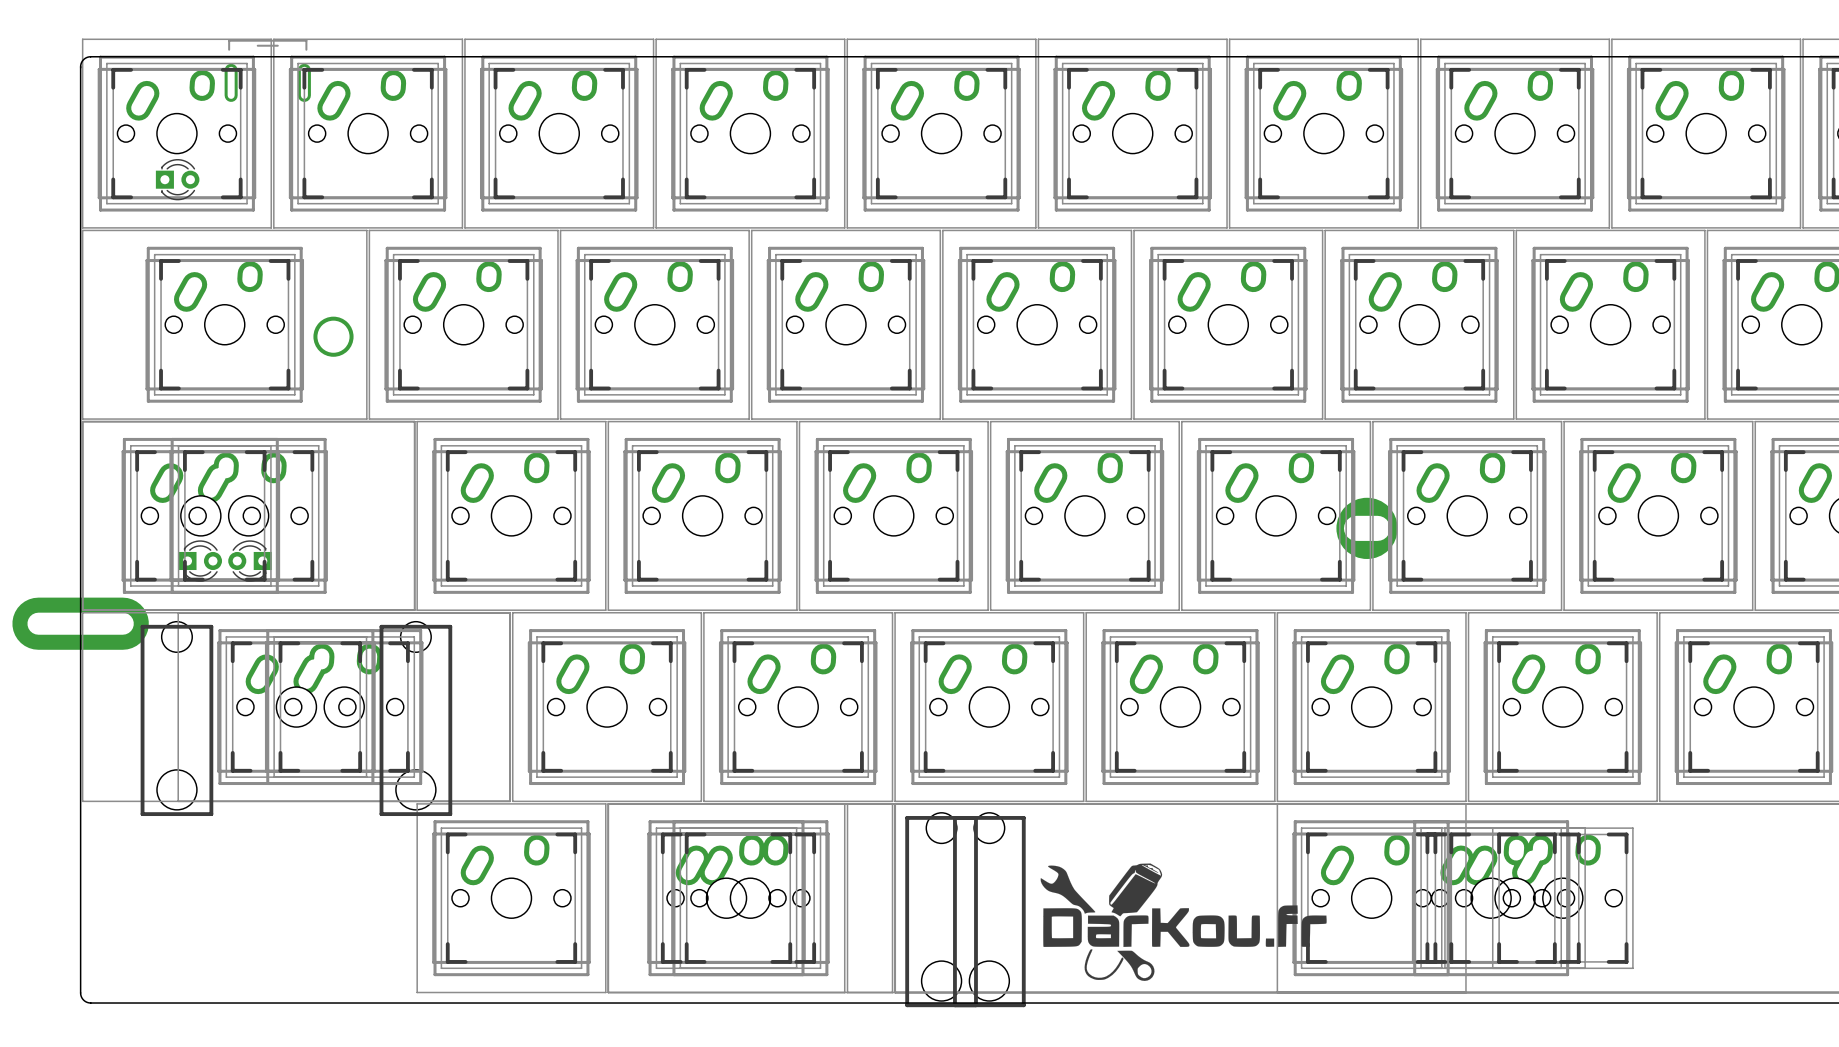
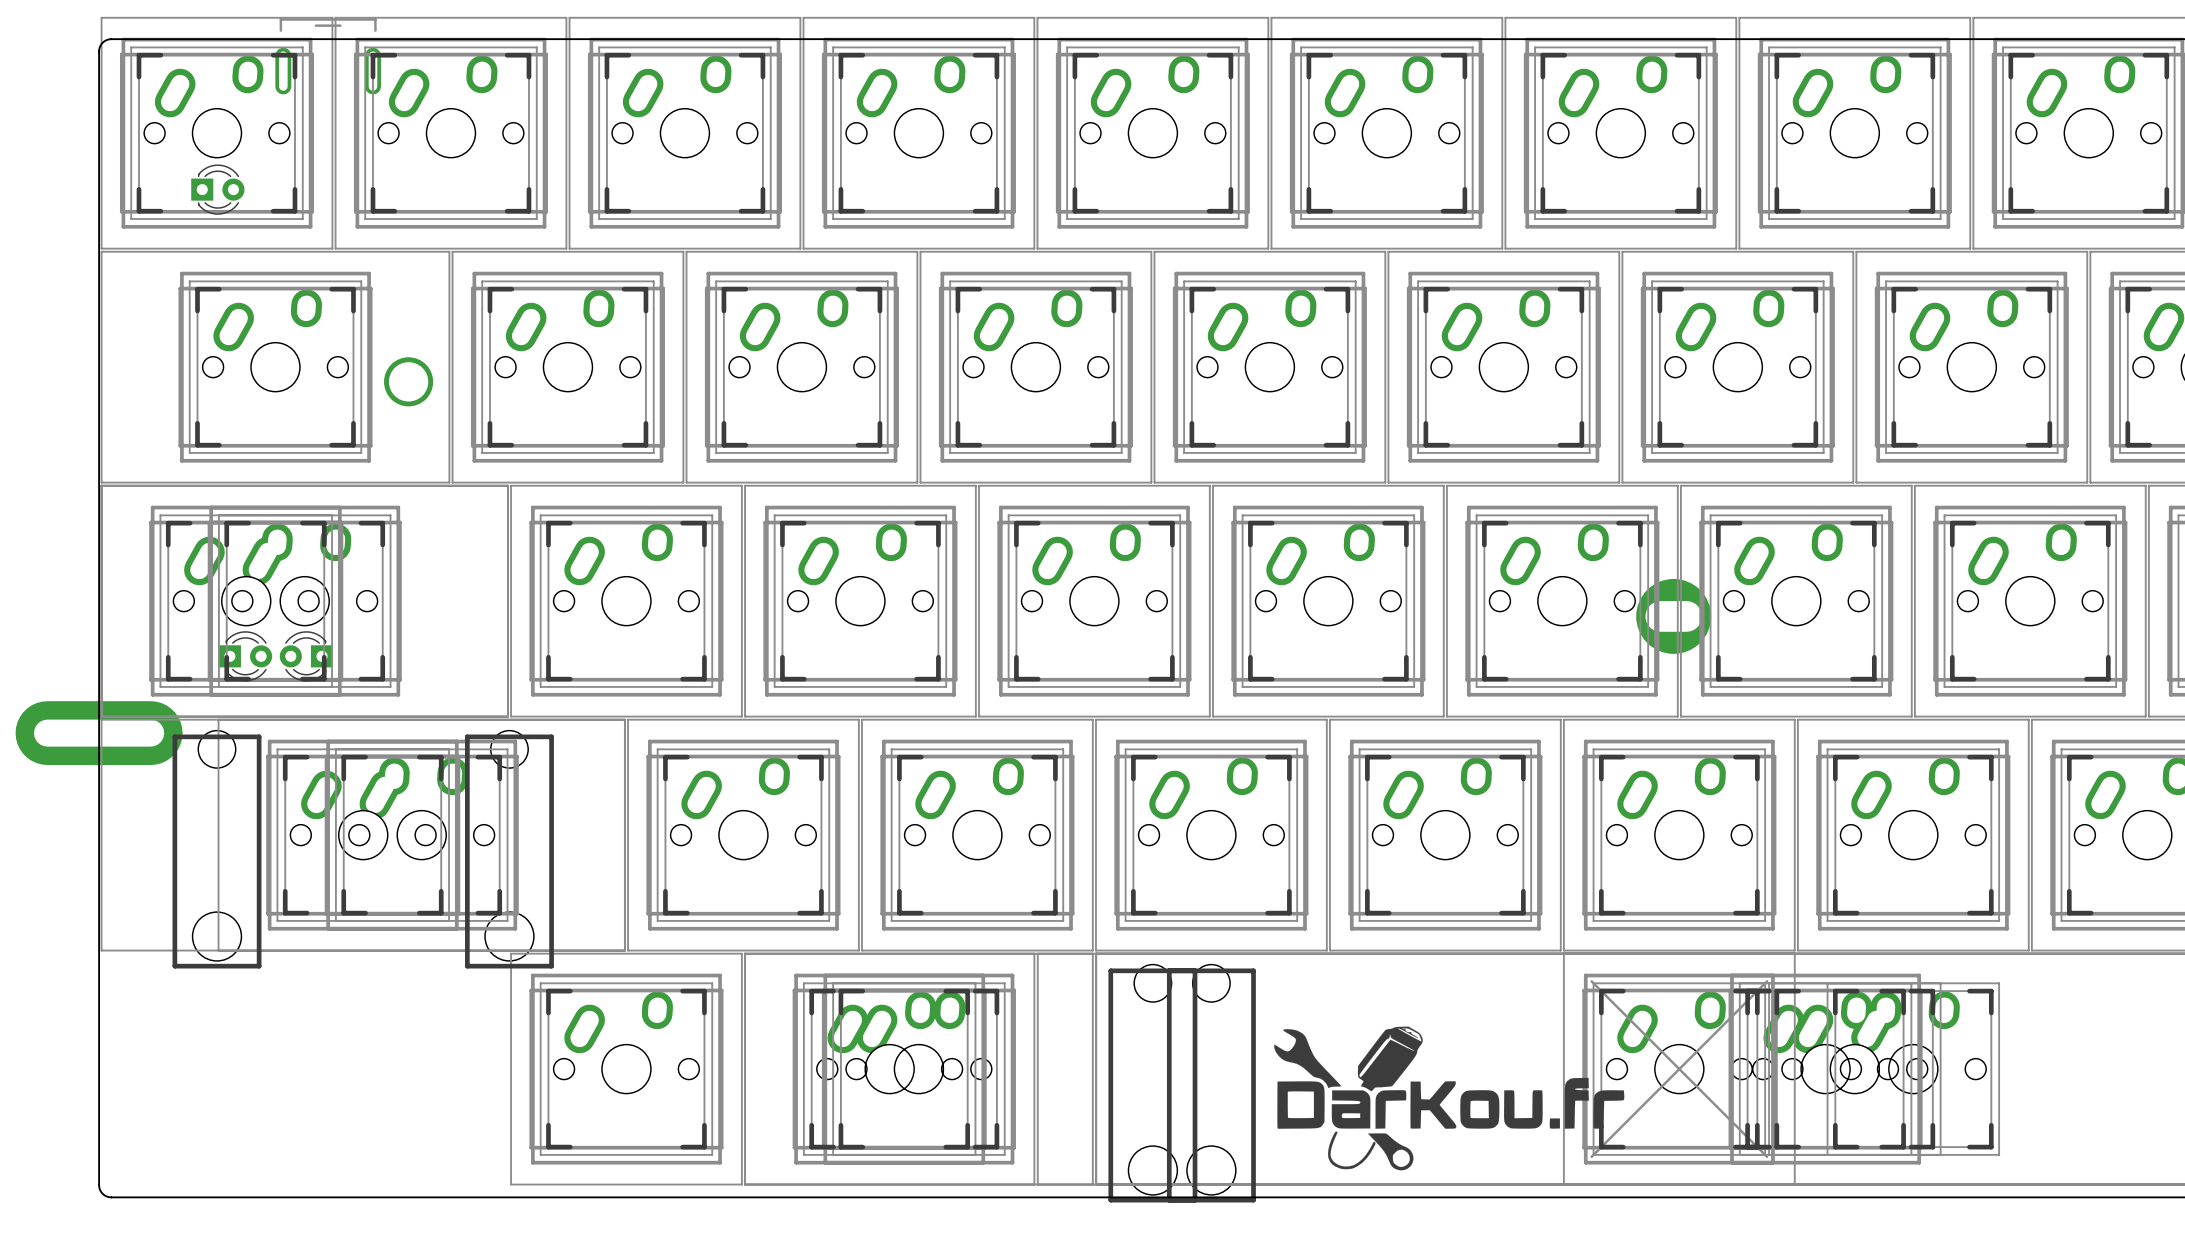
line: none -> (1591, 981) (1767, 1156)
line: none -> (1767, 981) (1591, 1156)

